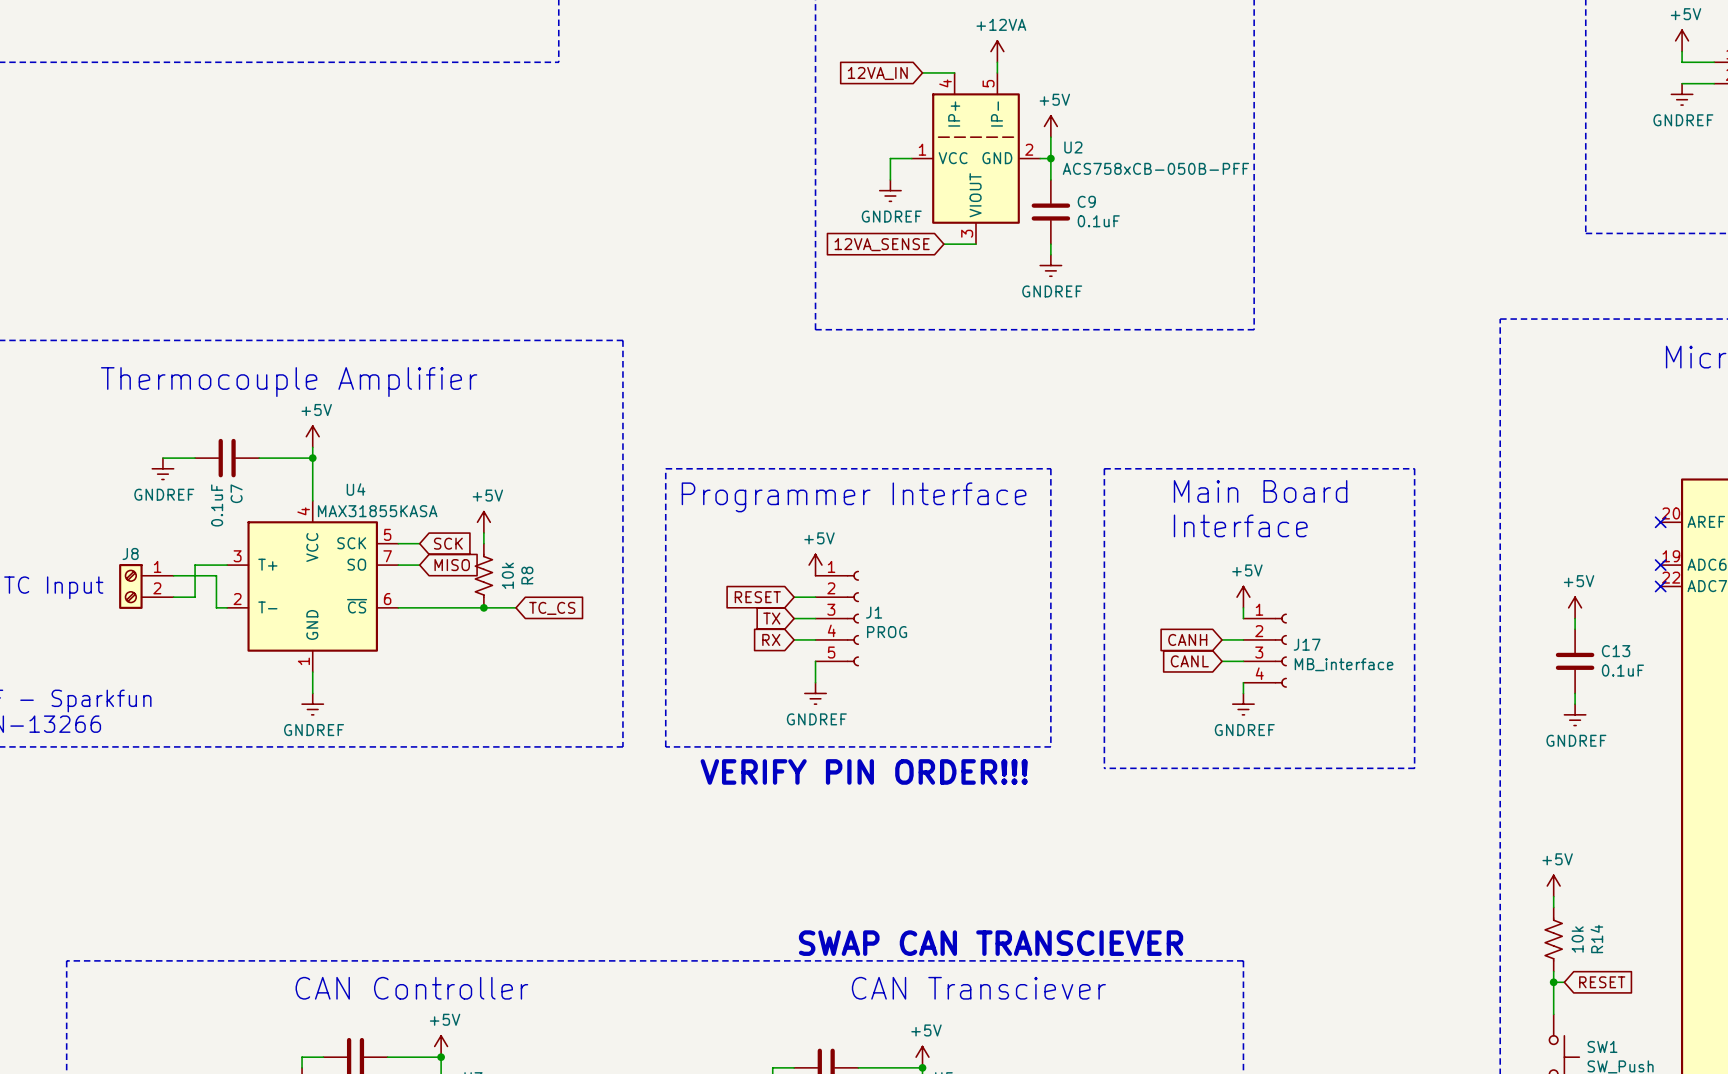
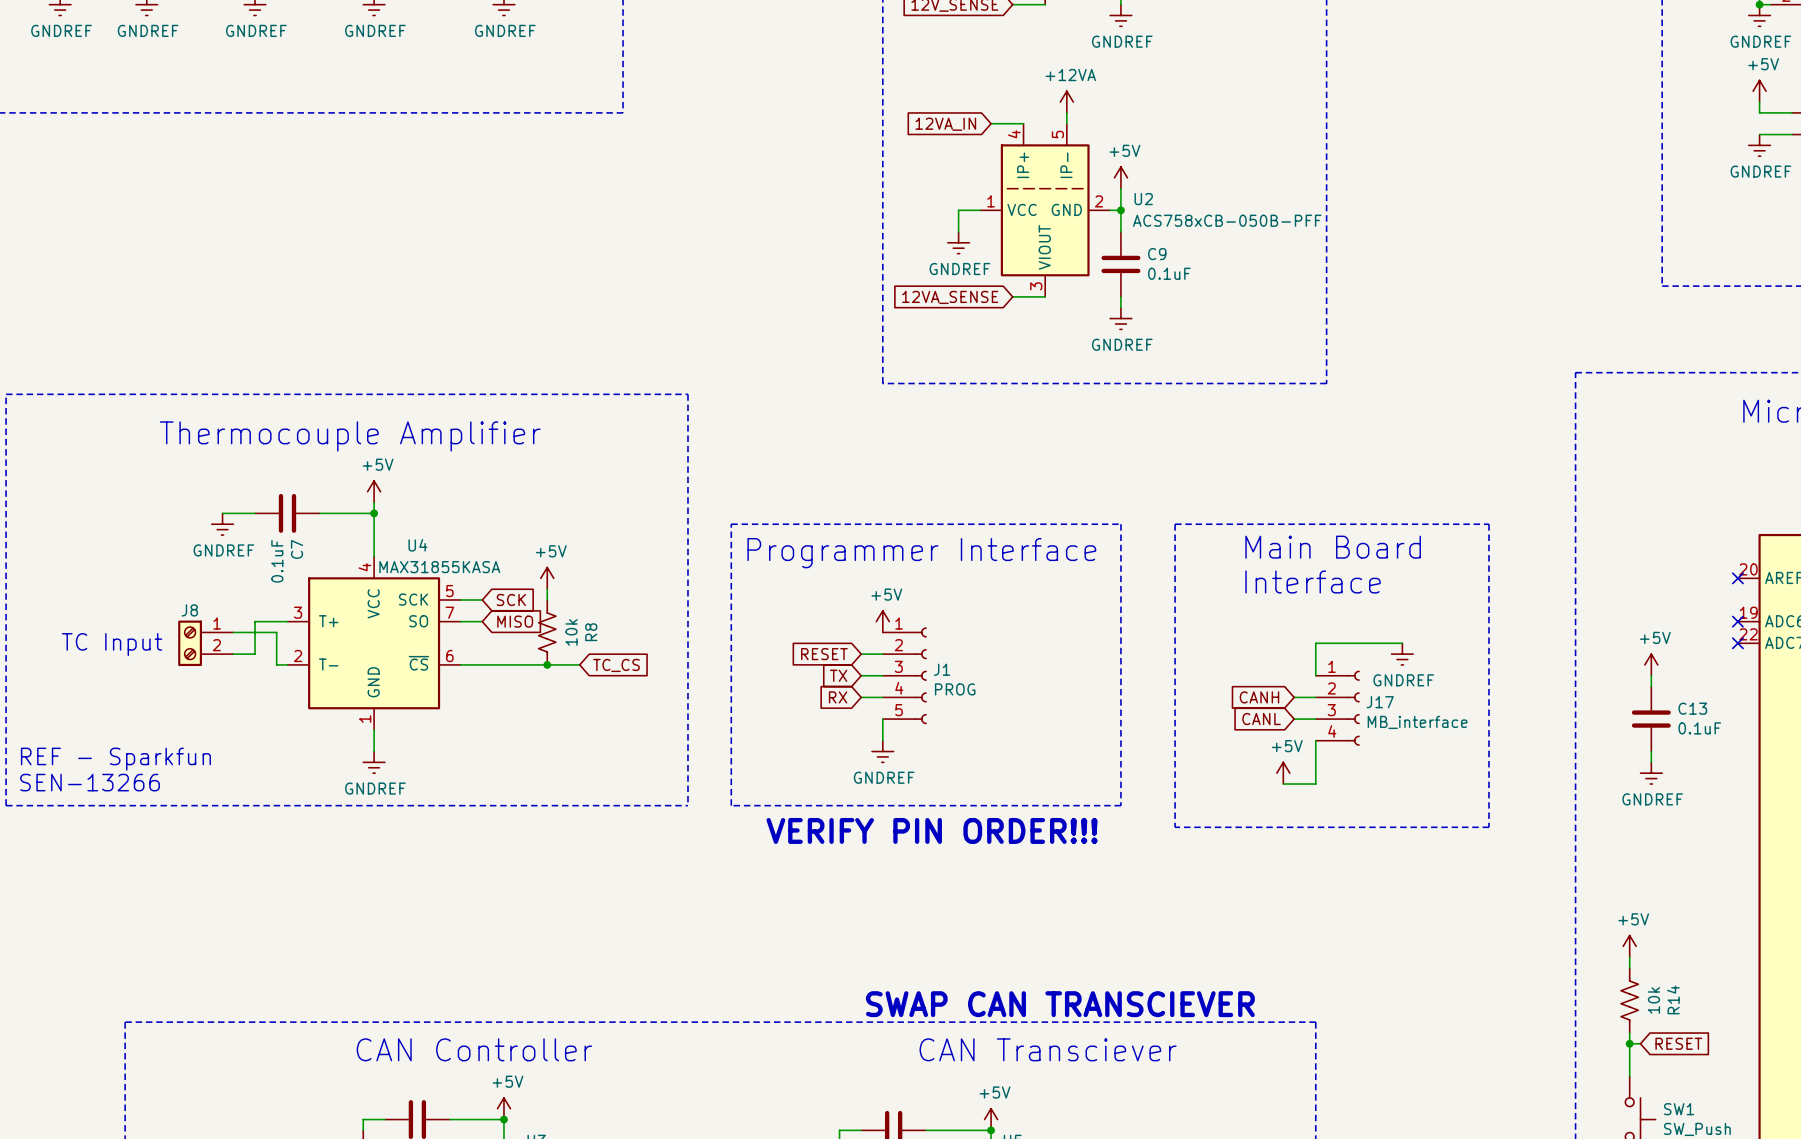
wire: none -> (1402, 643) (1315, 643) (1315, 664)
power symbol position: +5V (1243, 597) -> +5V (1283, 773)
wire: none -> (1315, 751) (1315, 784) (1283, 784)
power symbol position: GNDREF (1243, 704) -> GNDREF (1402, 654)

